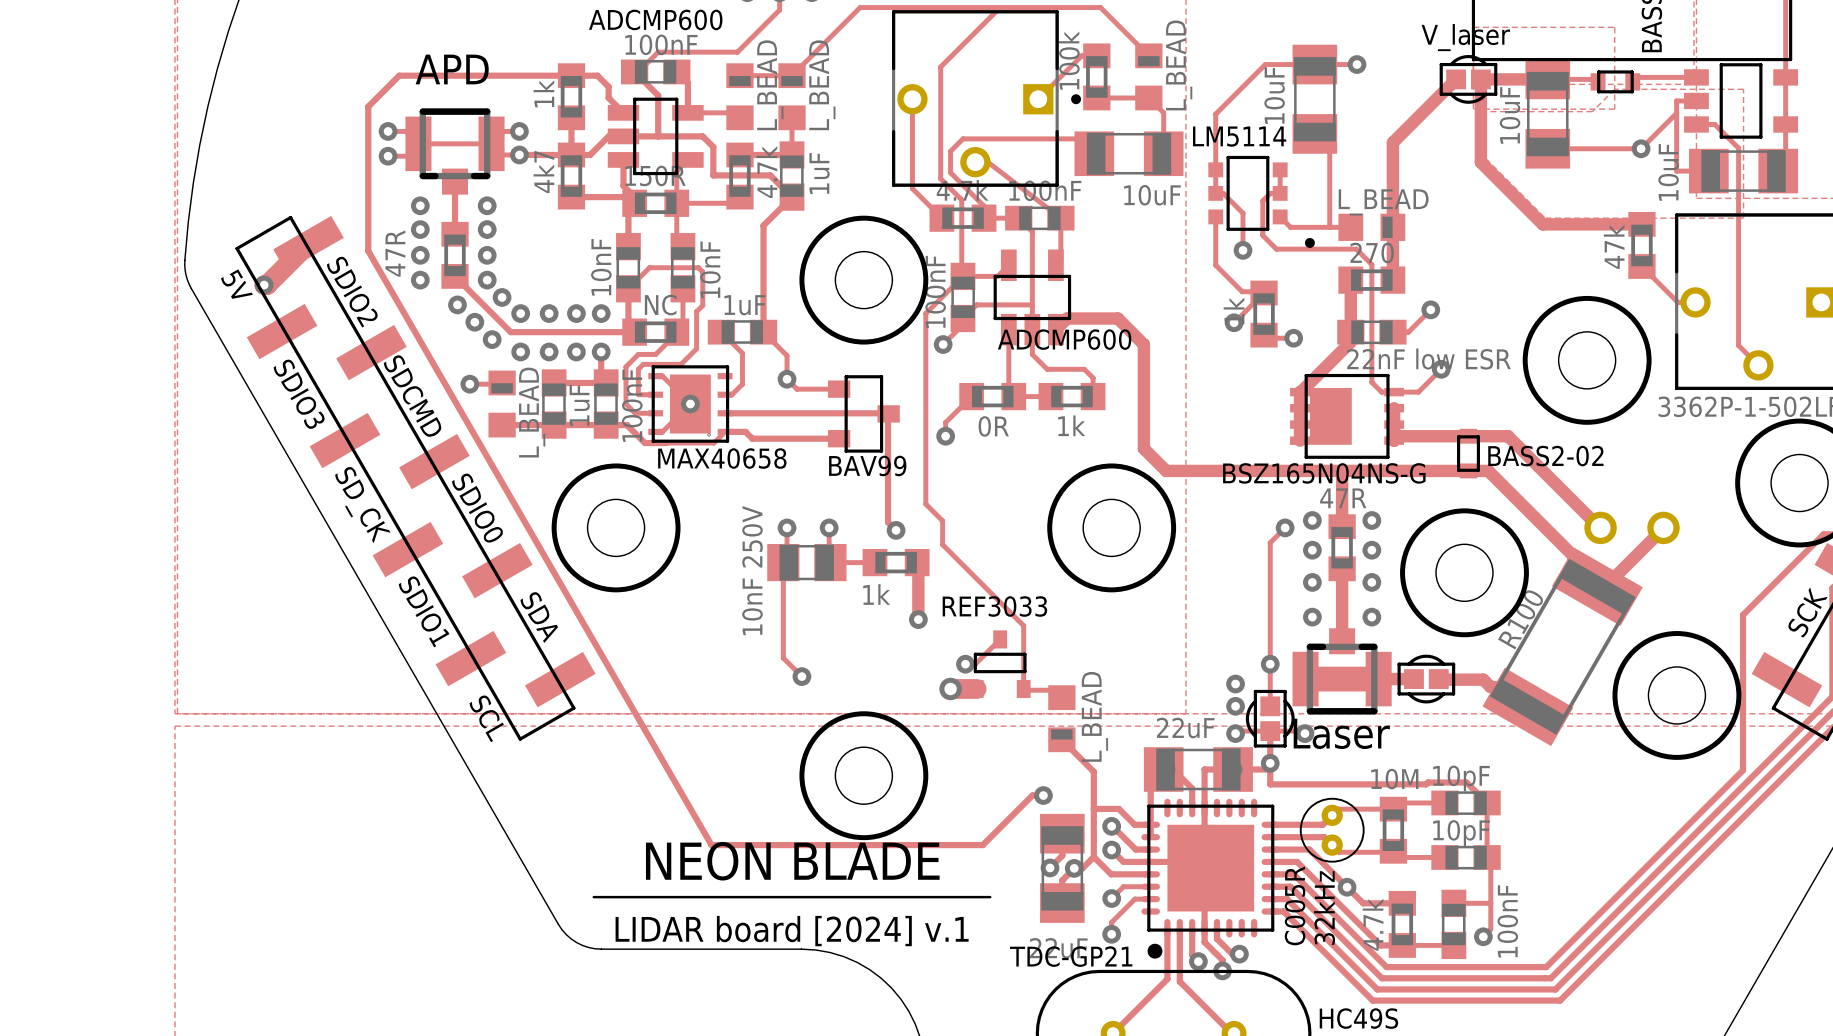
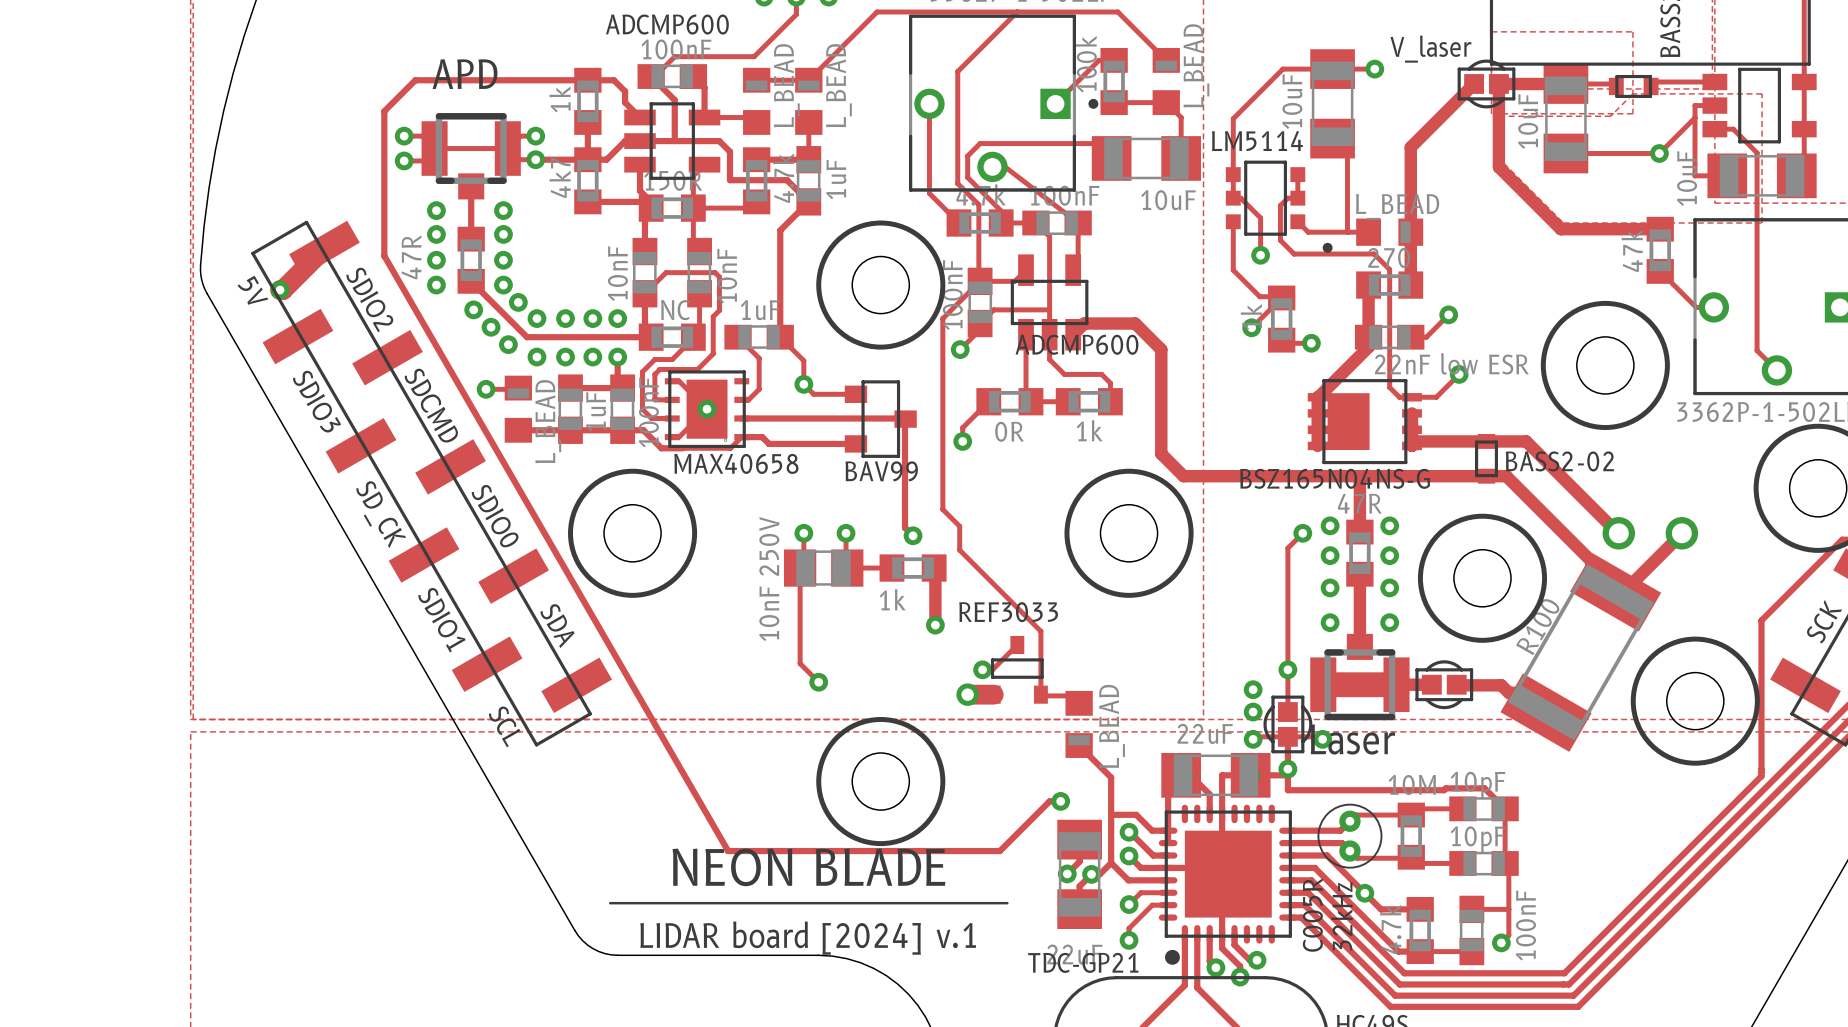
text position: V_laser (1465, 37) -> V_laser (1430, 49)

